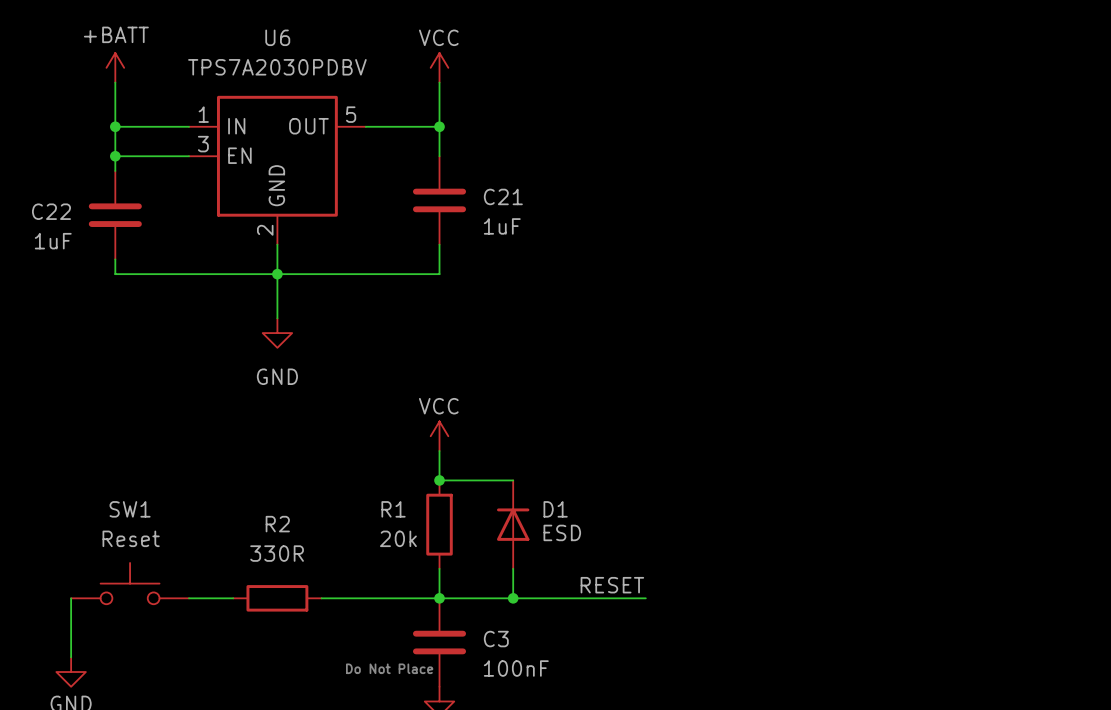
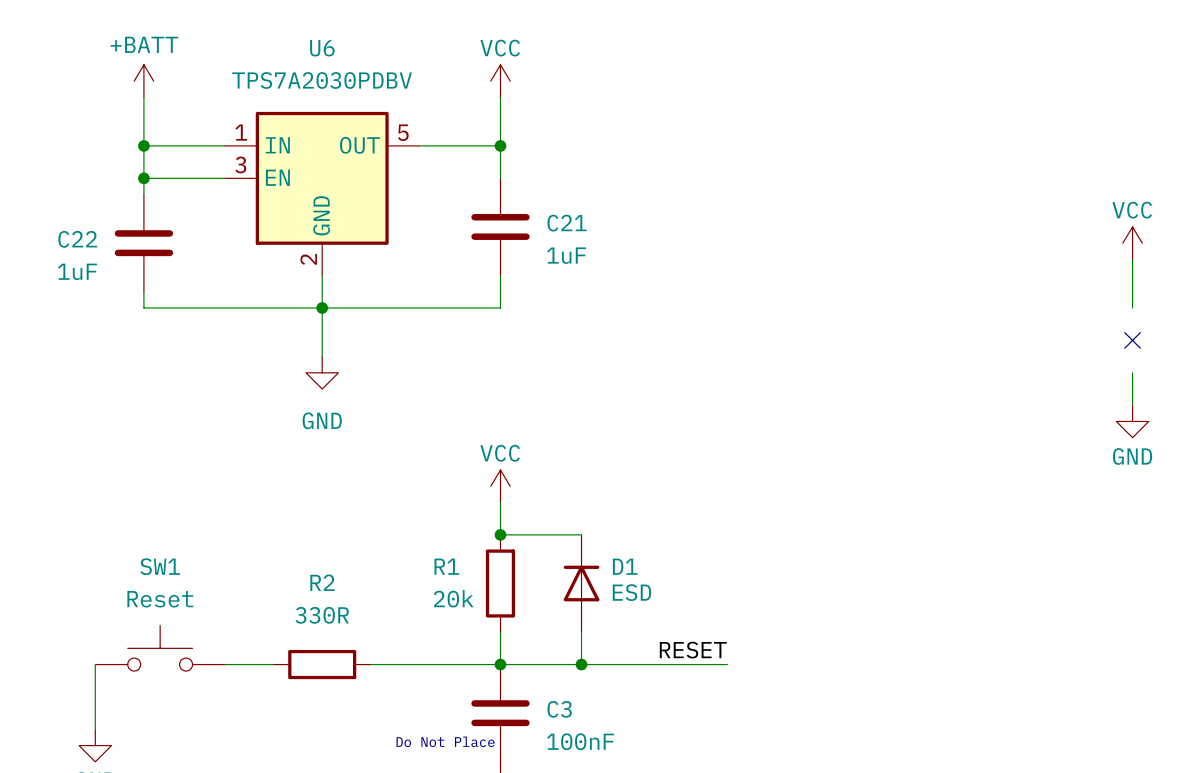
power symbol: none -> VCC (1132, 243)
wire: none -> (1132, 259) (1132, 308)
no-connect mark: none -> (1132, 340)
wire: none -> (1132, 372) (1132, 405)
power symbol: none -> GND (1132, 421)

